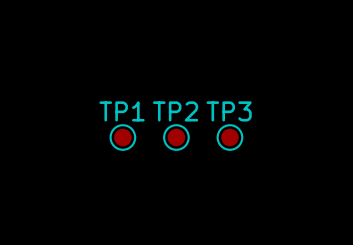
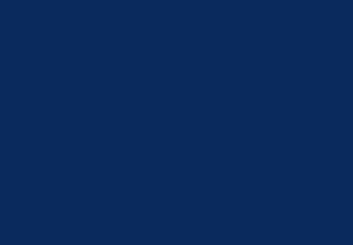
TP1: (122, 137) -> none
TP2: (176, 137) -> none
TP3: (229, 137) -> none

